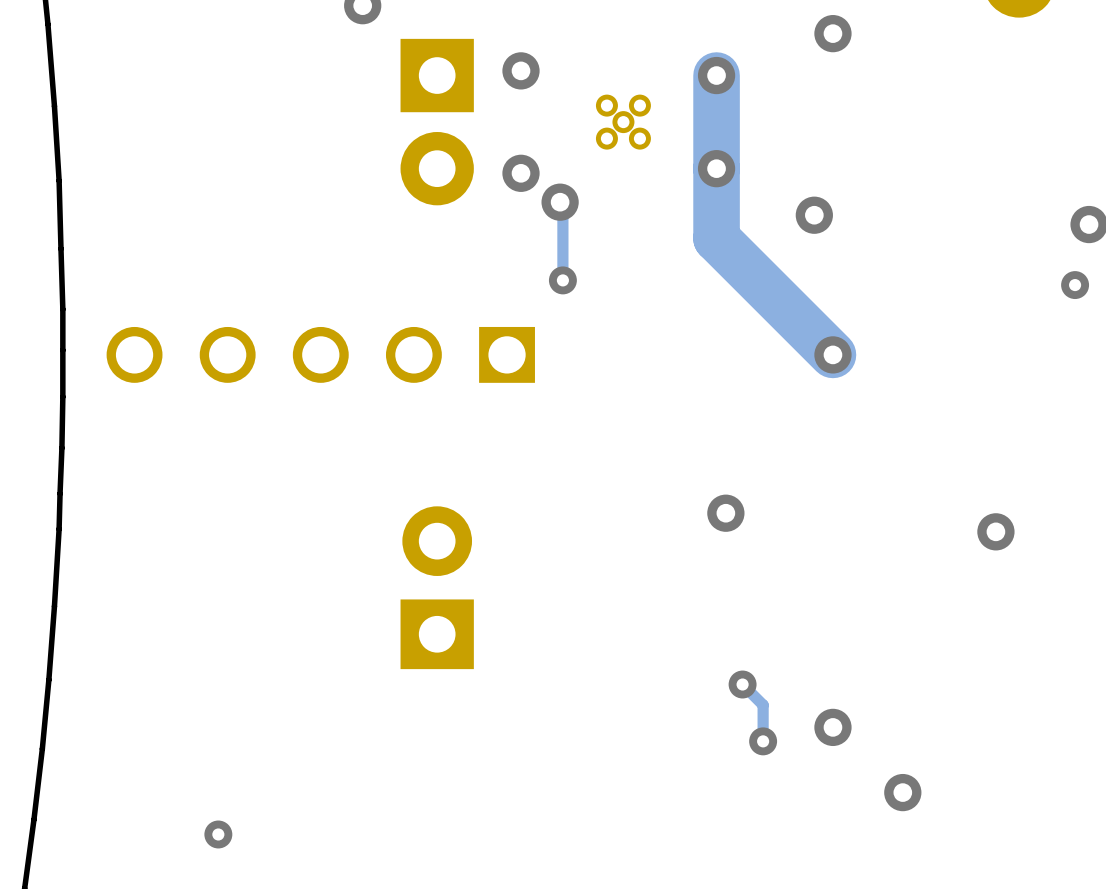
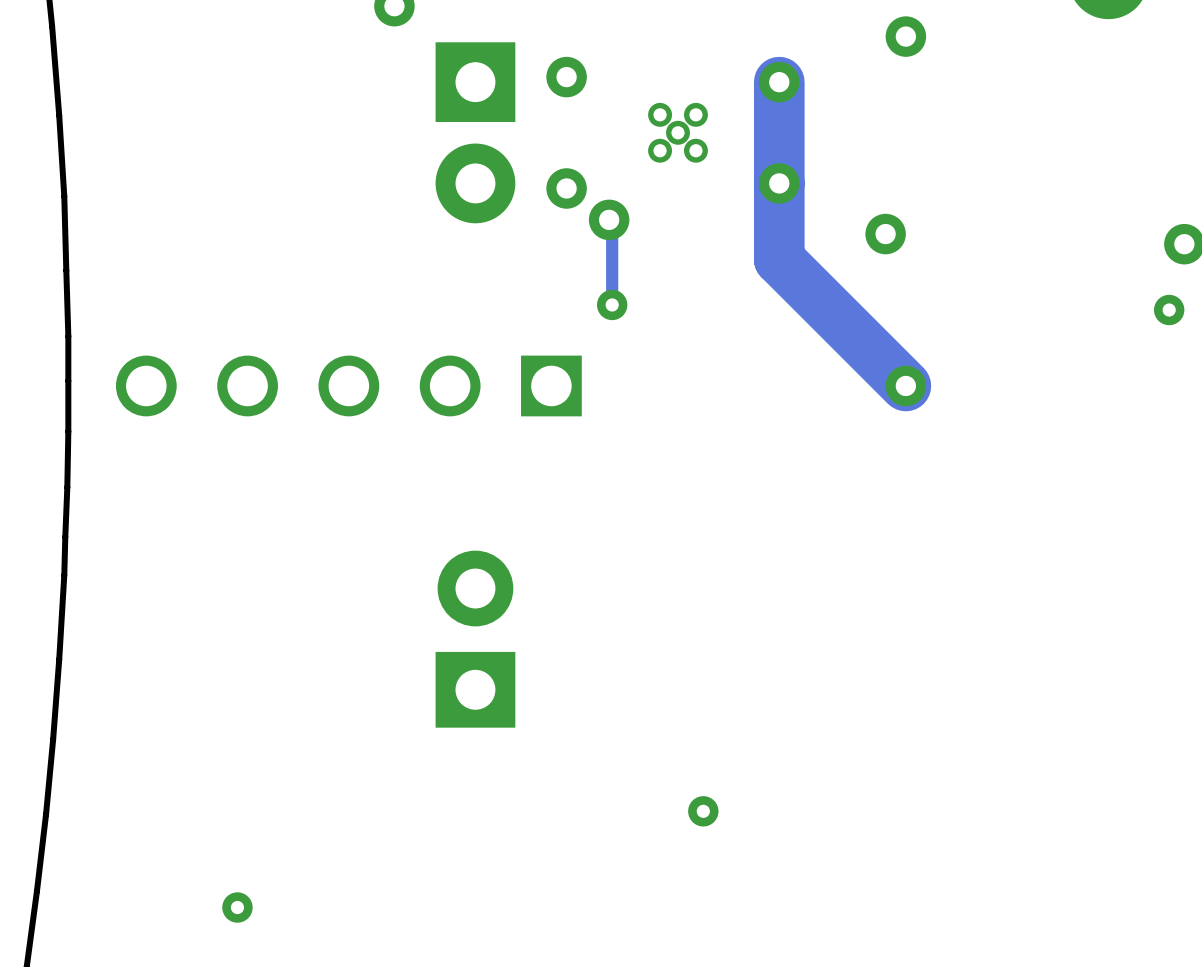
via: (725, 513) -> none
via: (995, 531) -> none
track: (742, 684) (763, 705) (763, 741) -> none
via: (742, 684) -> none
via: (832, 727) -> none
via: (763, 741) -> none
via: none -> (703, 811)
via: (902, 792) -> none

